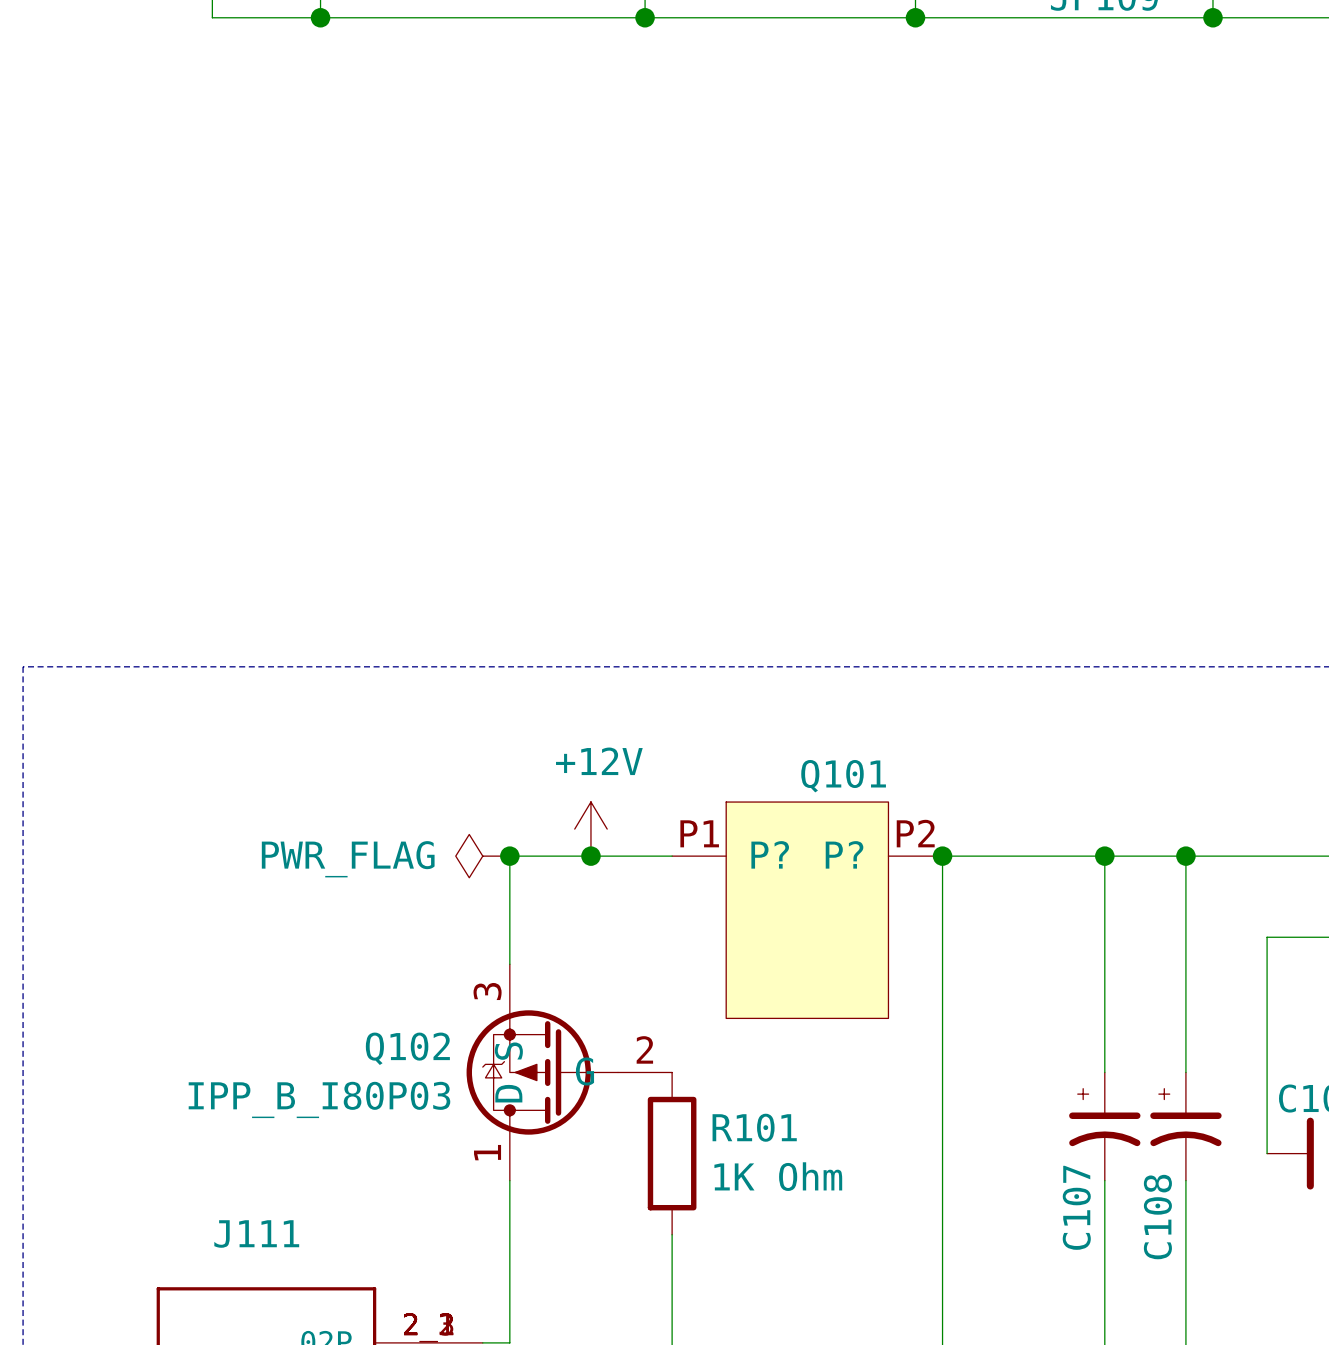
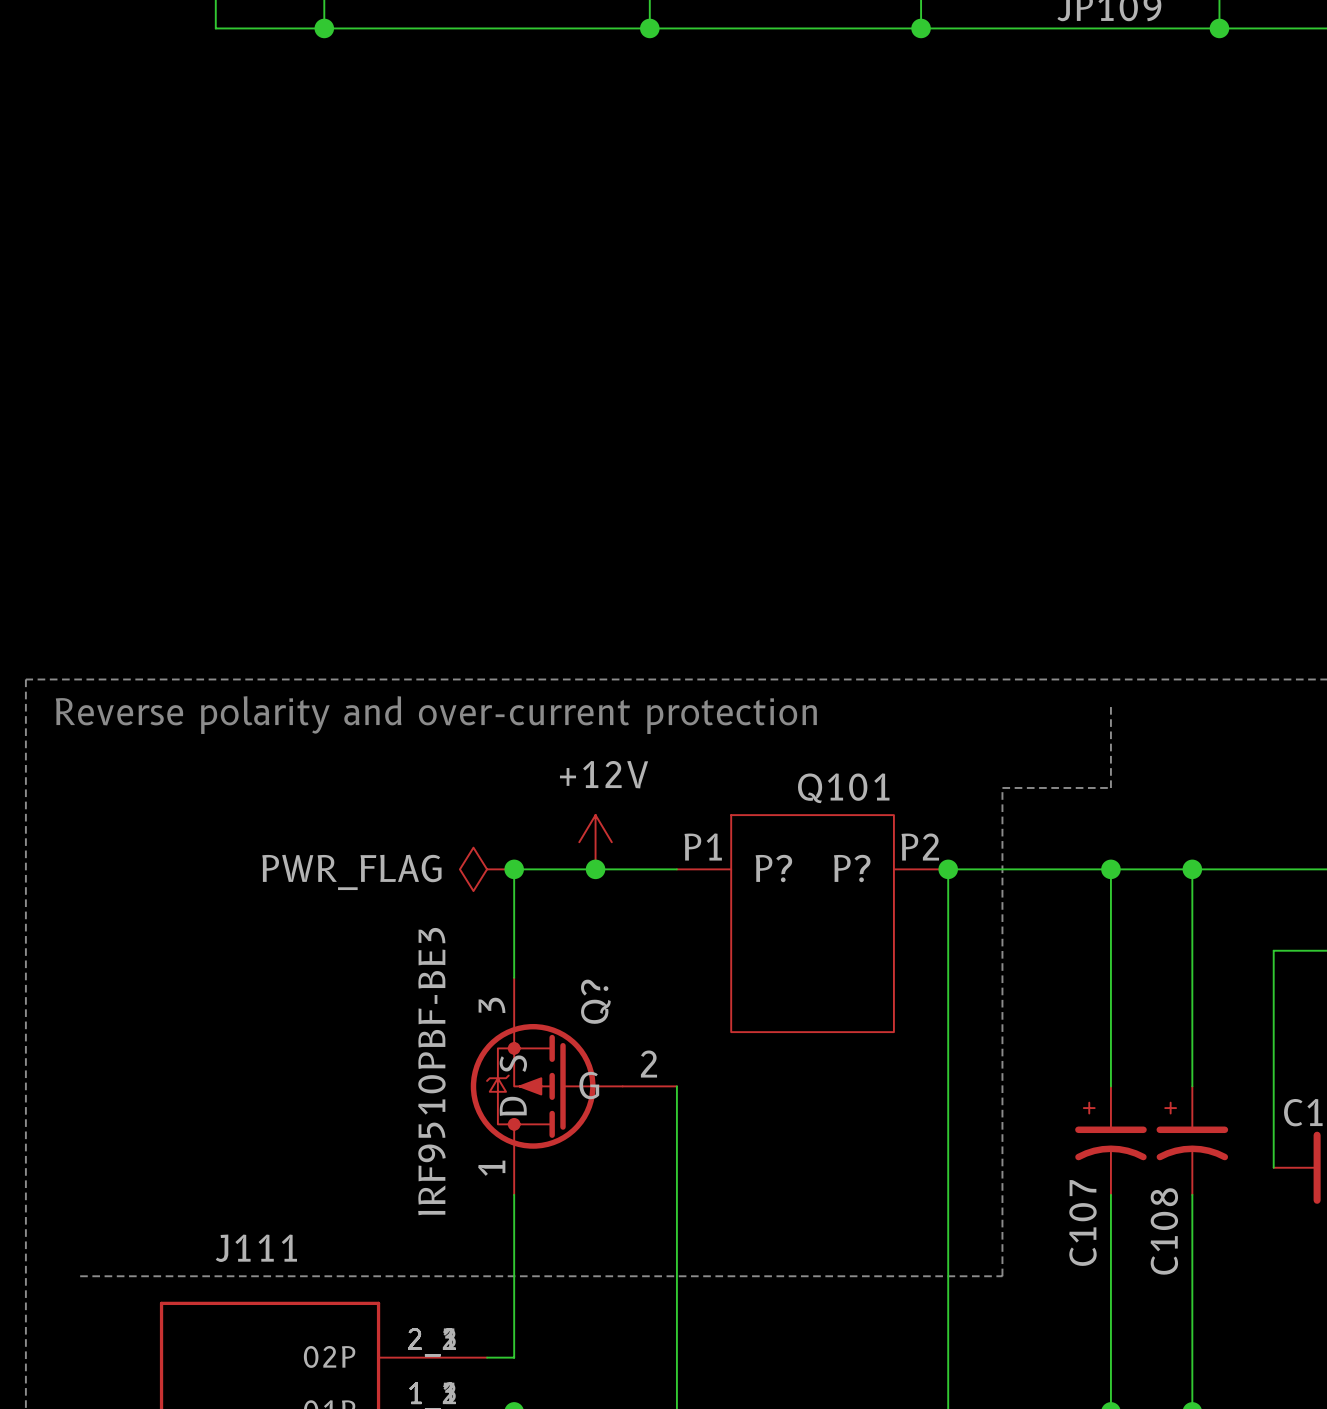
line: none -> (1110, 706) (1110, 787) (1002, 787) (1002, 1276) (80, 1276)
text: none -> Reverse polarity and over-current protection (436, 715)
Q102 name: Q102 (407, 1048) -> Q? (595, 1001)
wire: none -> (676, 1086) (676, 1249)
Q102 value: IPP_B_I80P03 (319, 1099) -> IRF9510PBF-BE3 (431, 1071)
R101: 1K Ohm (672, 1153) -> none

